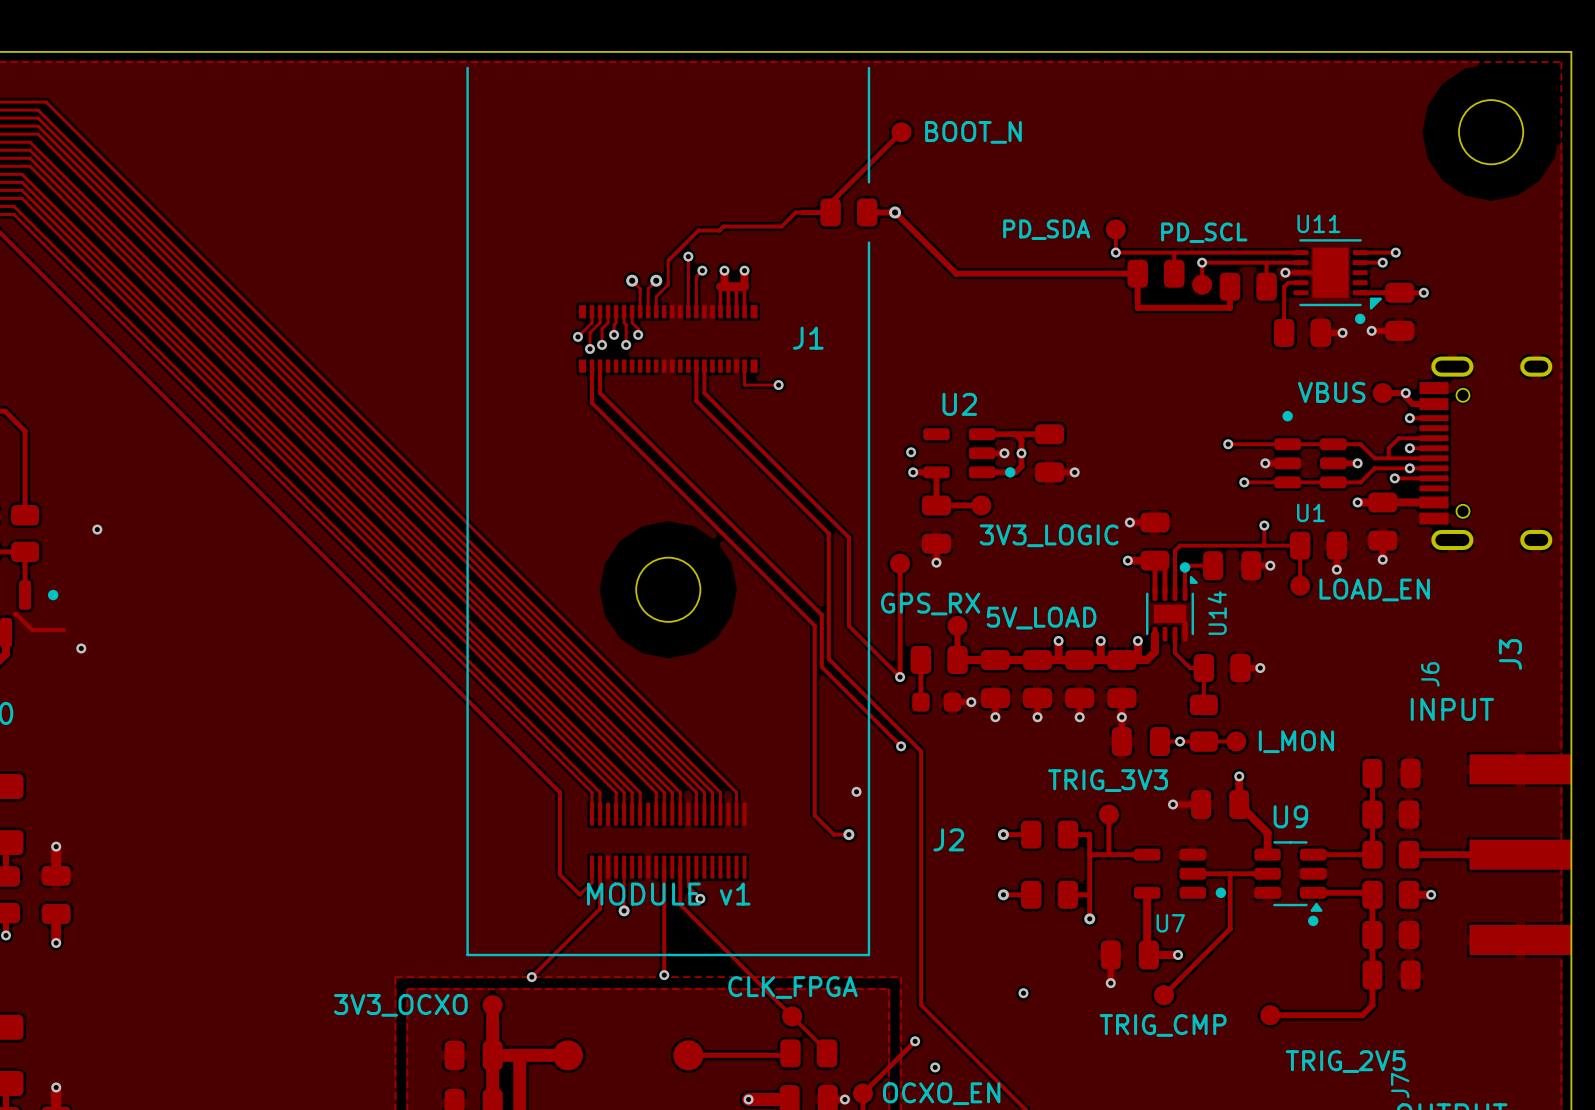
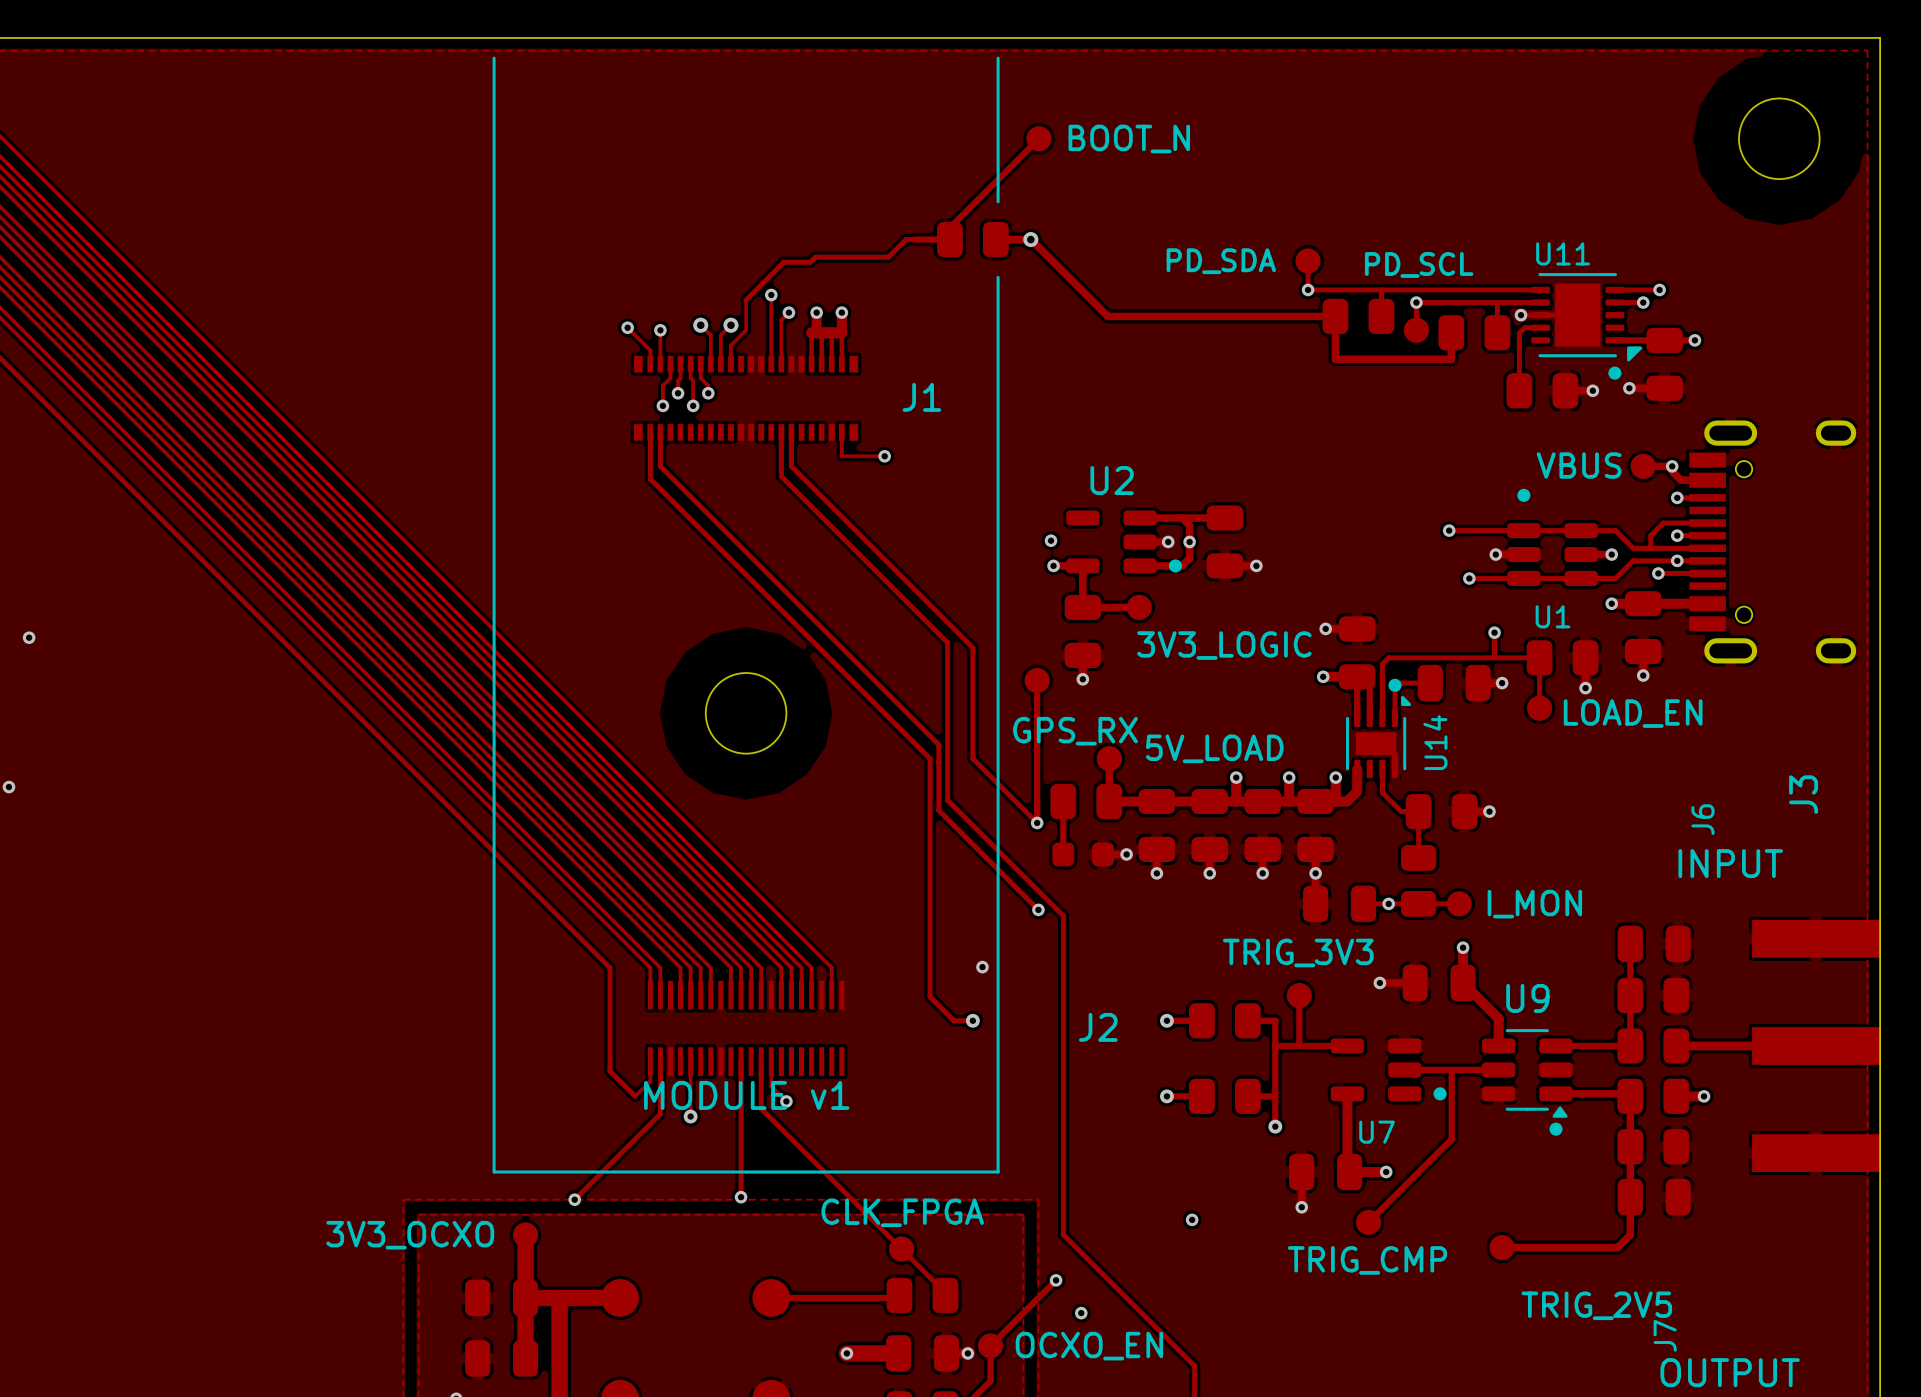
via: none -> (627, 327)
via: none -> (660, 330)
track: (592, 311) (592, 322) (577, 336) -> (650, 364) (650, 350) (627, 327)
track: (600, 311) (600, 322) (590, 332) (590, 348) -> (660, 364) (660, 330)
via: (577, 336) -> none
via: (590, 348) -> none

